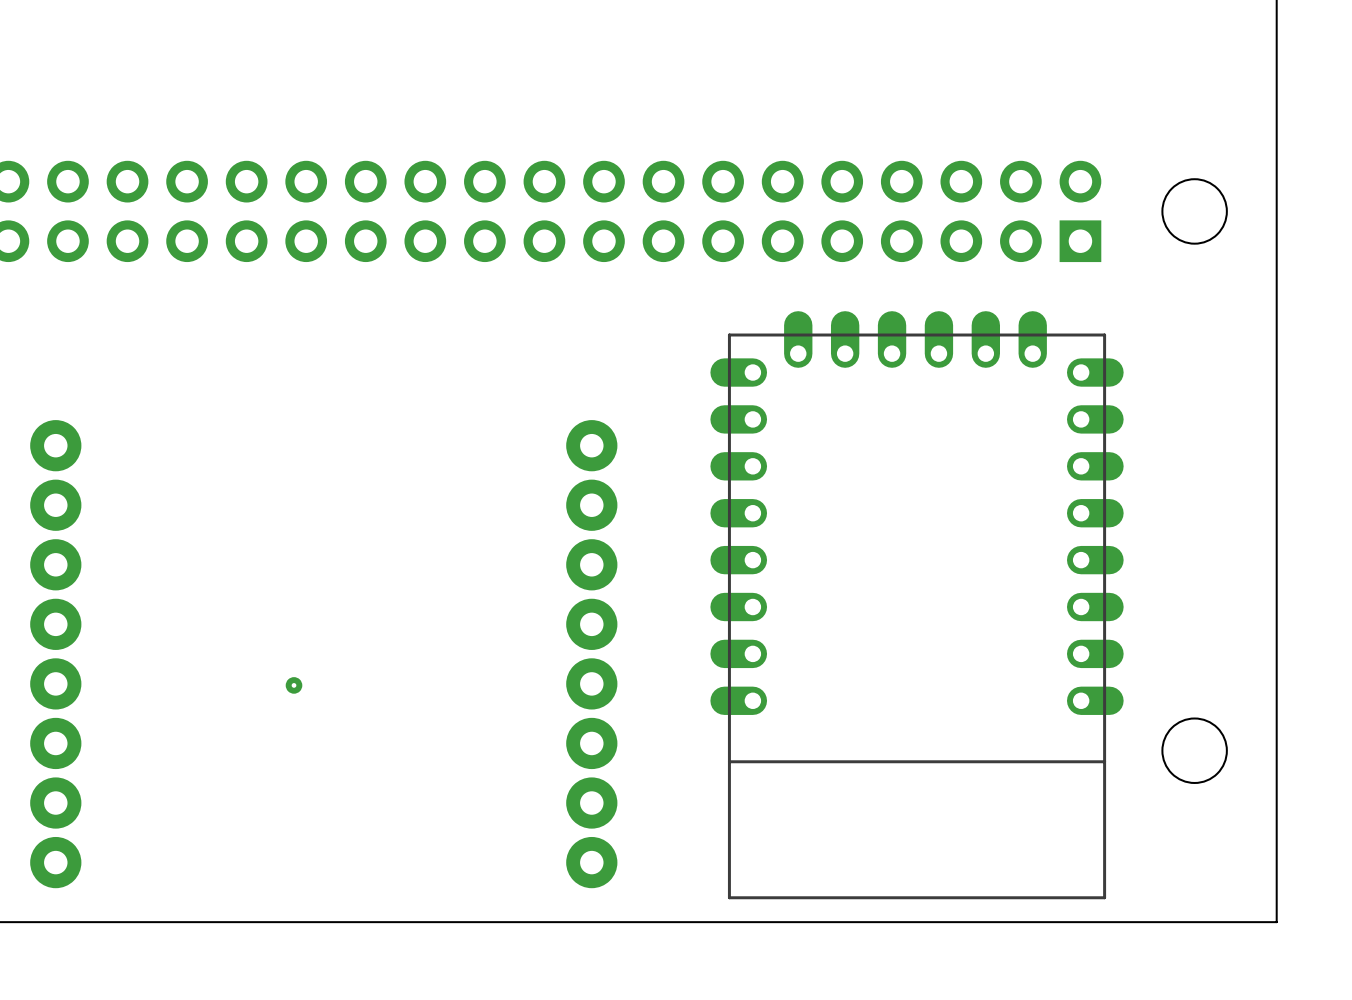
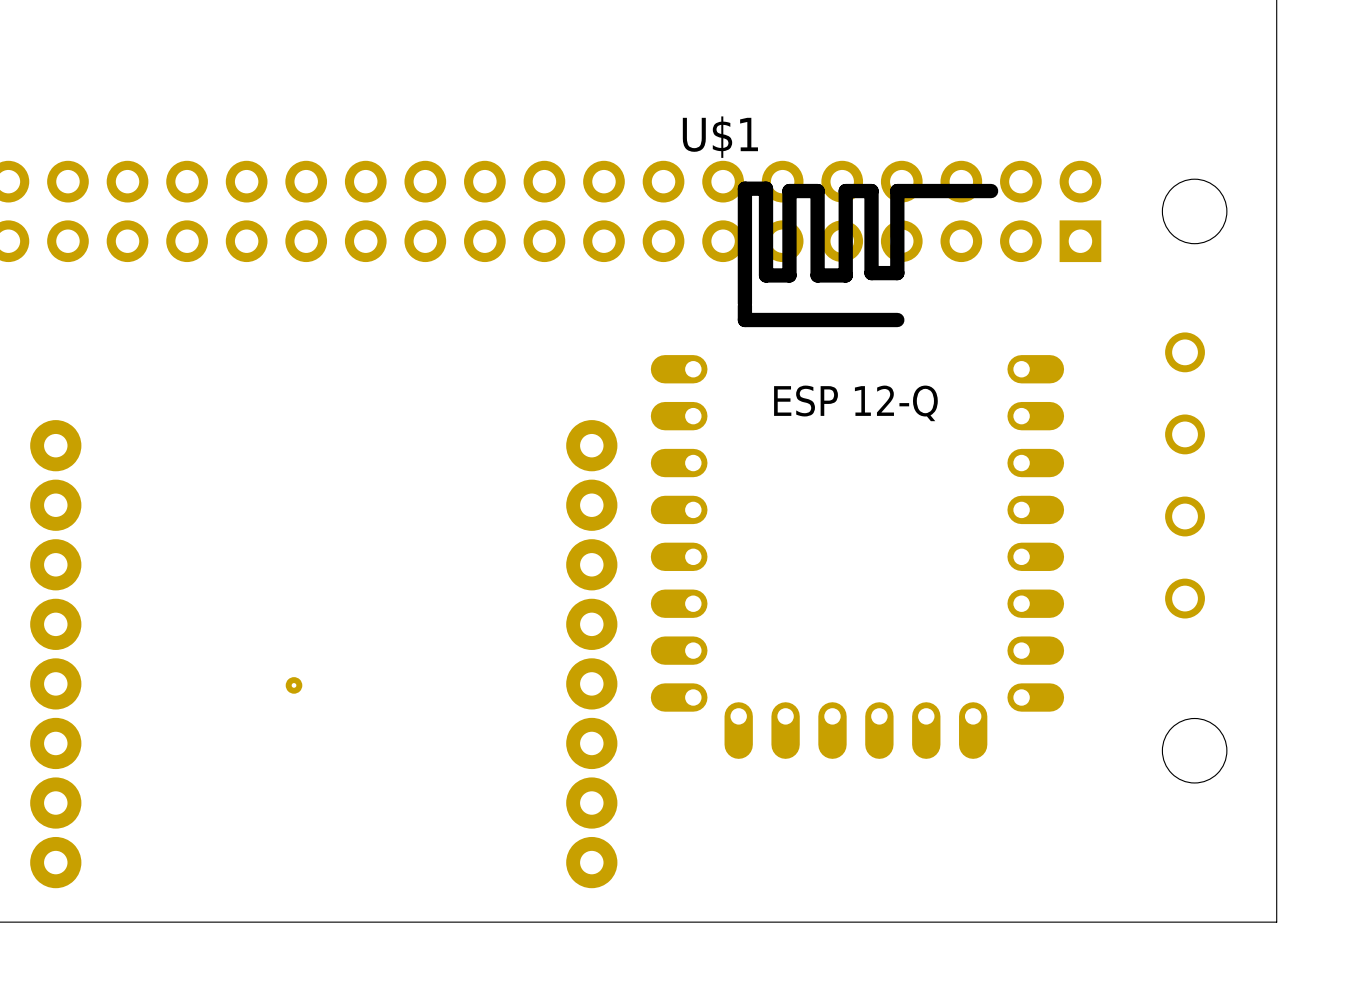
part: none -> (1185, 475)
U$1 side: top (917, 605) -> bottom (857, 470)

